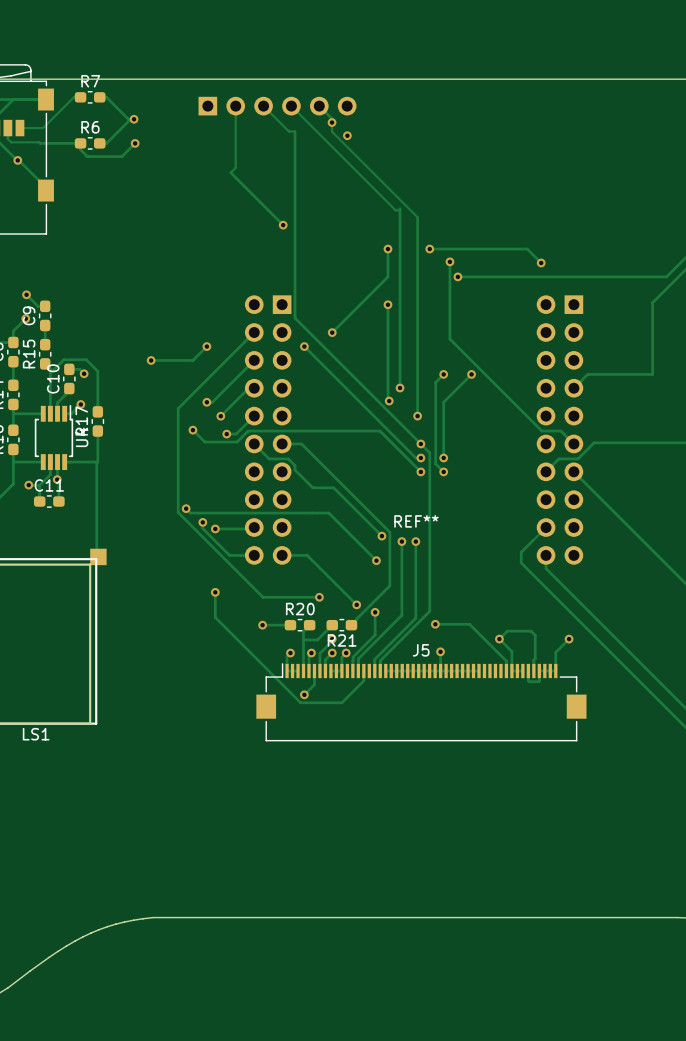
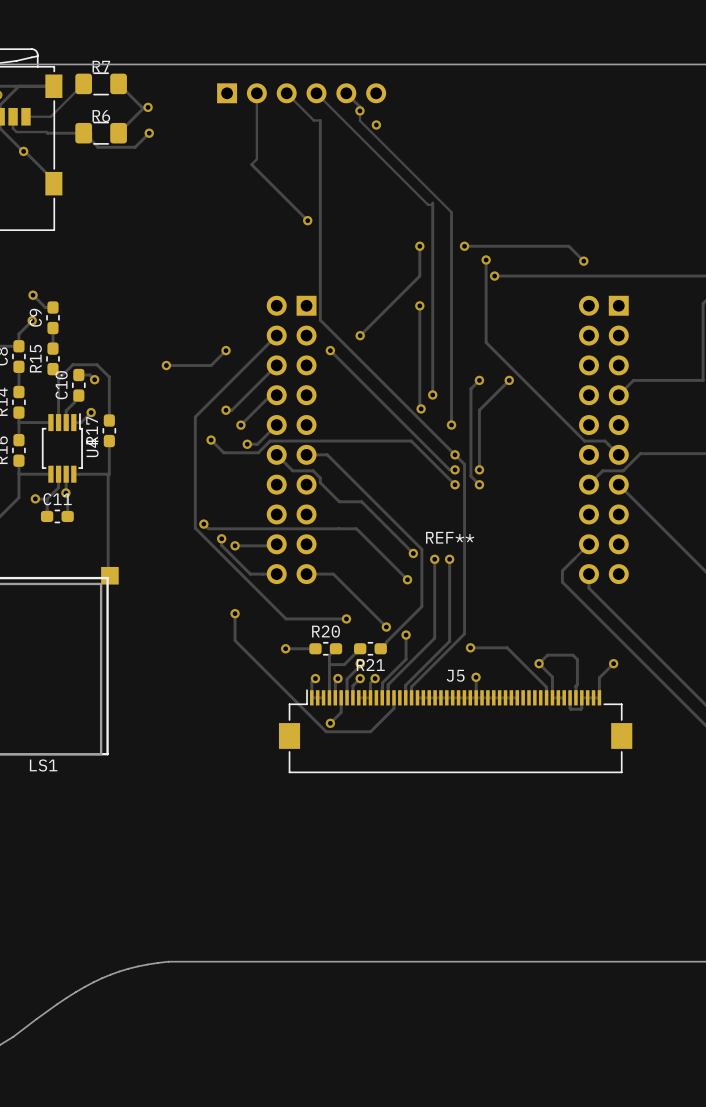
R7 footprint: [74, 91, 106, 104] -> [75, 72, 127, 96]
R6 footprint: [74, 137, 106, 150] -> [75, 121, 127, 145]

